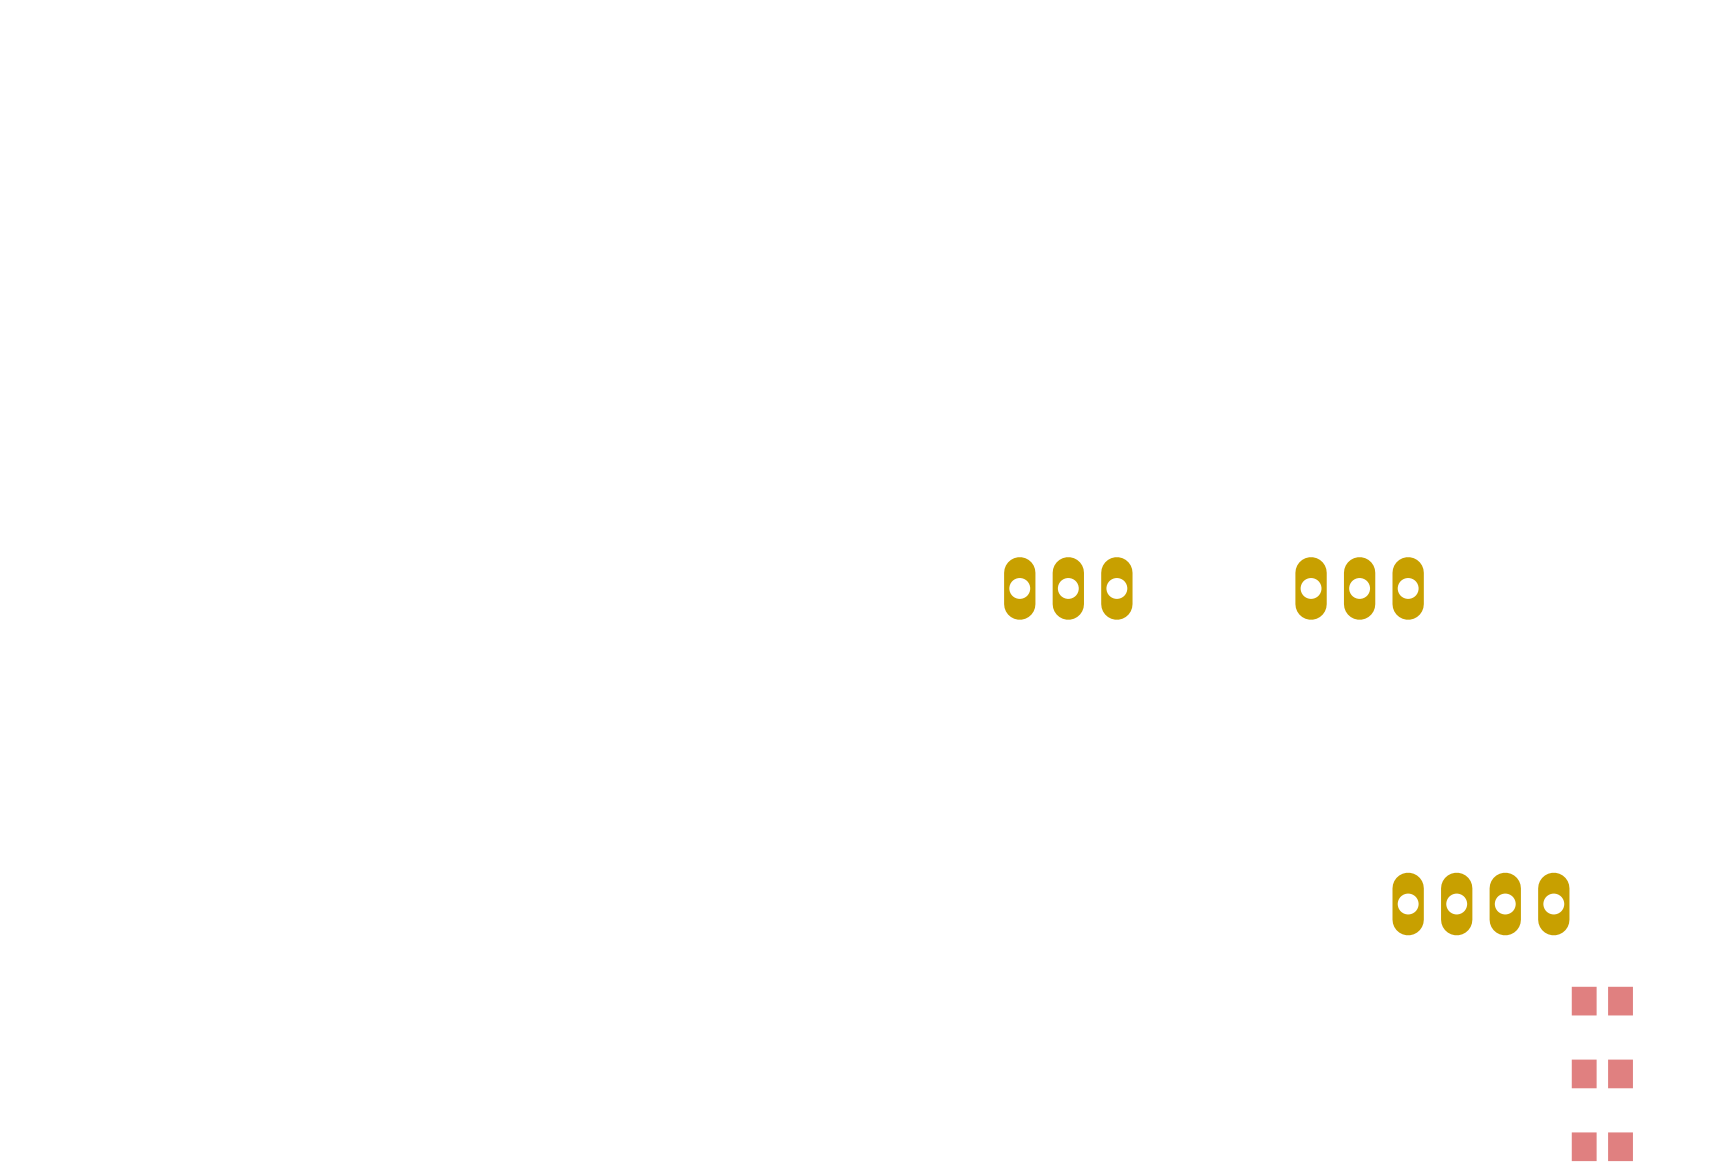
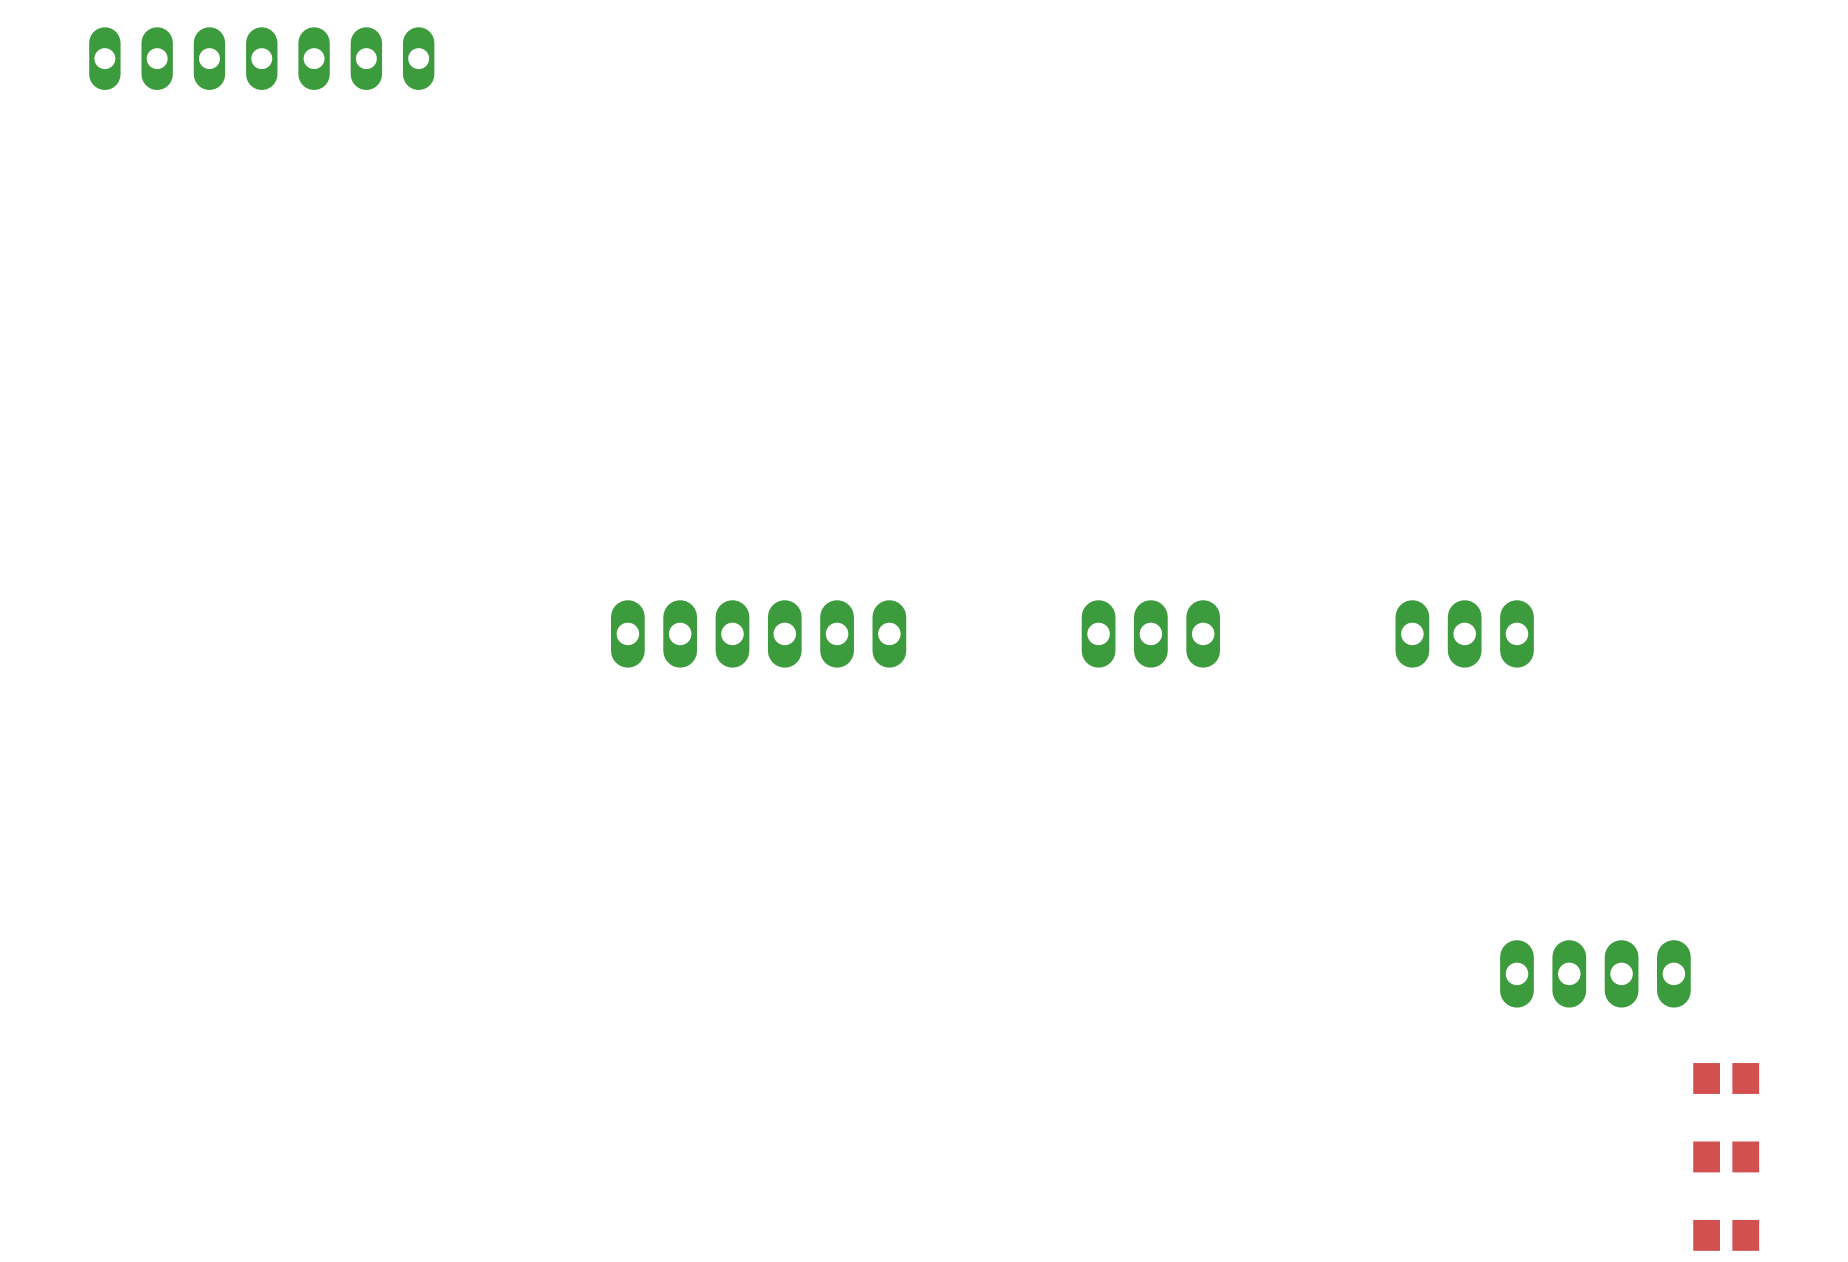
part: none -> (261, 58)
part: none -> (758, 633)

